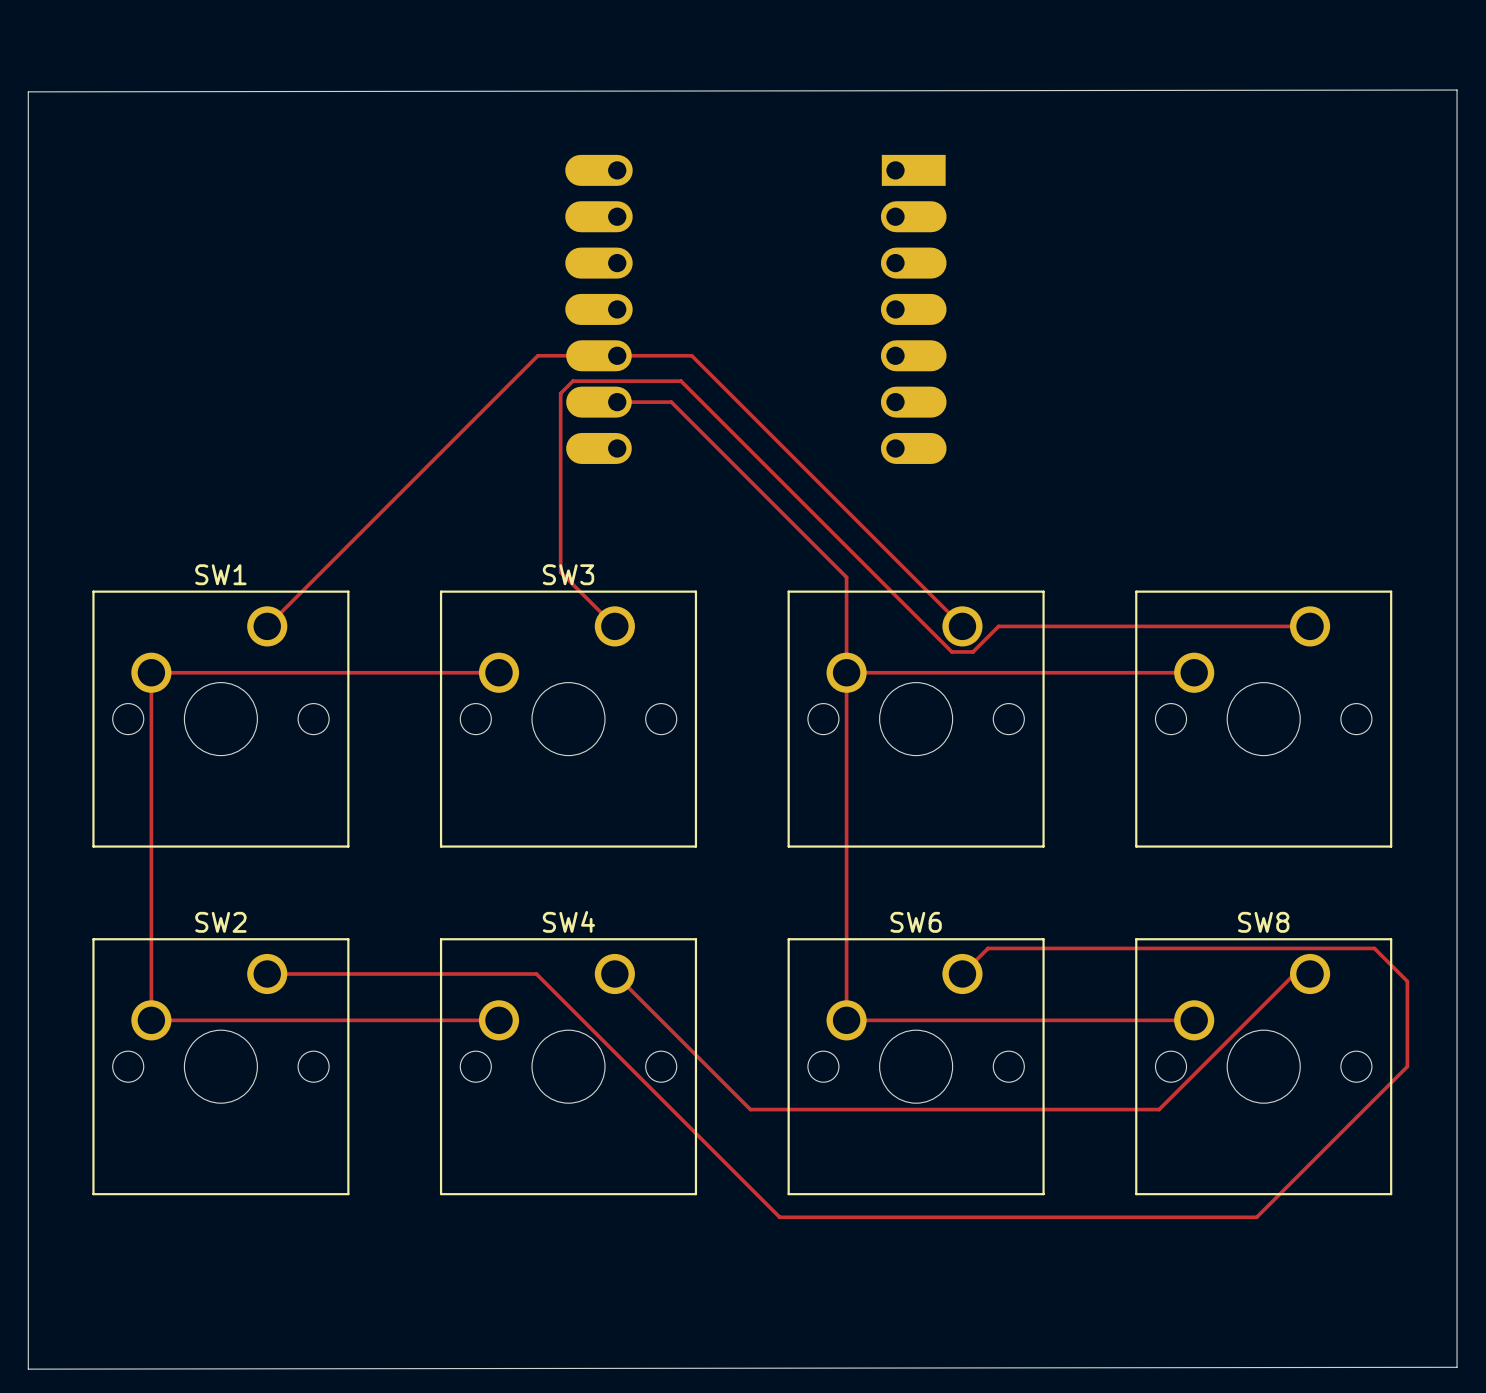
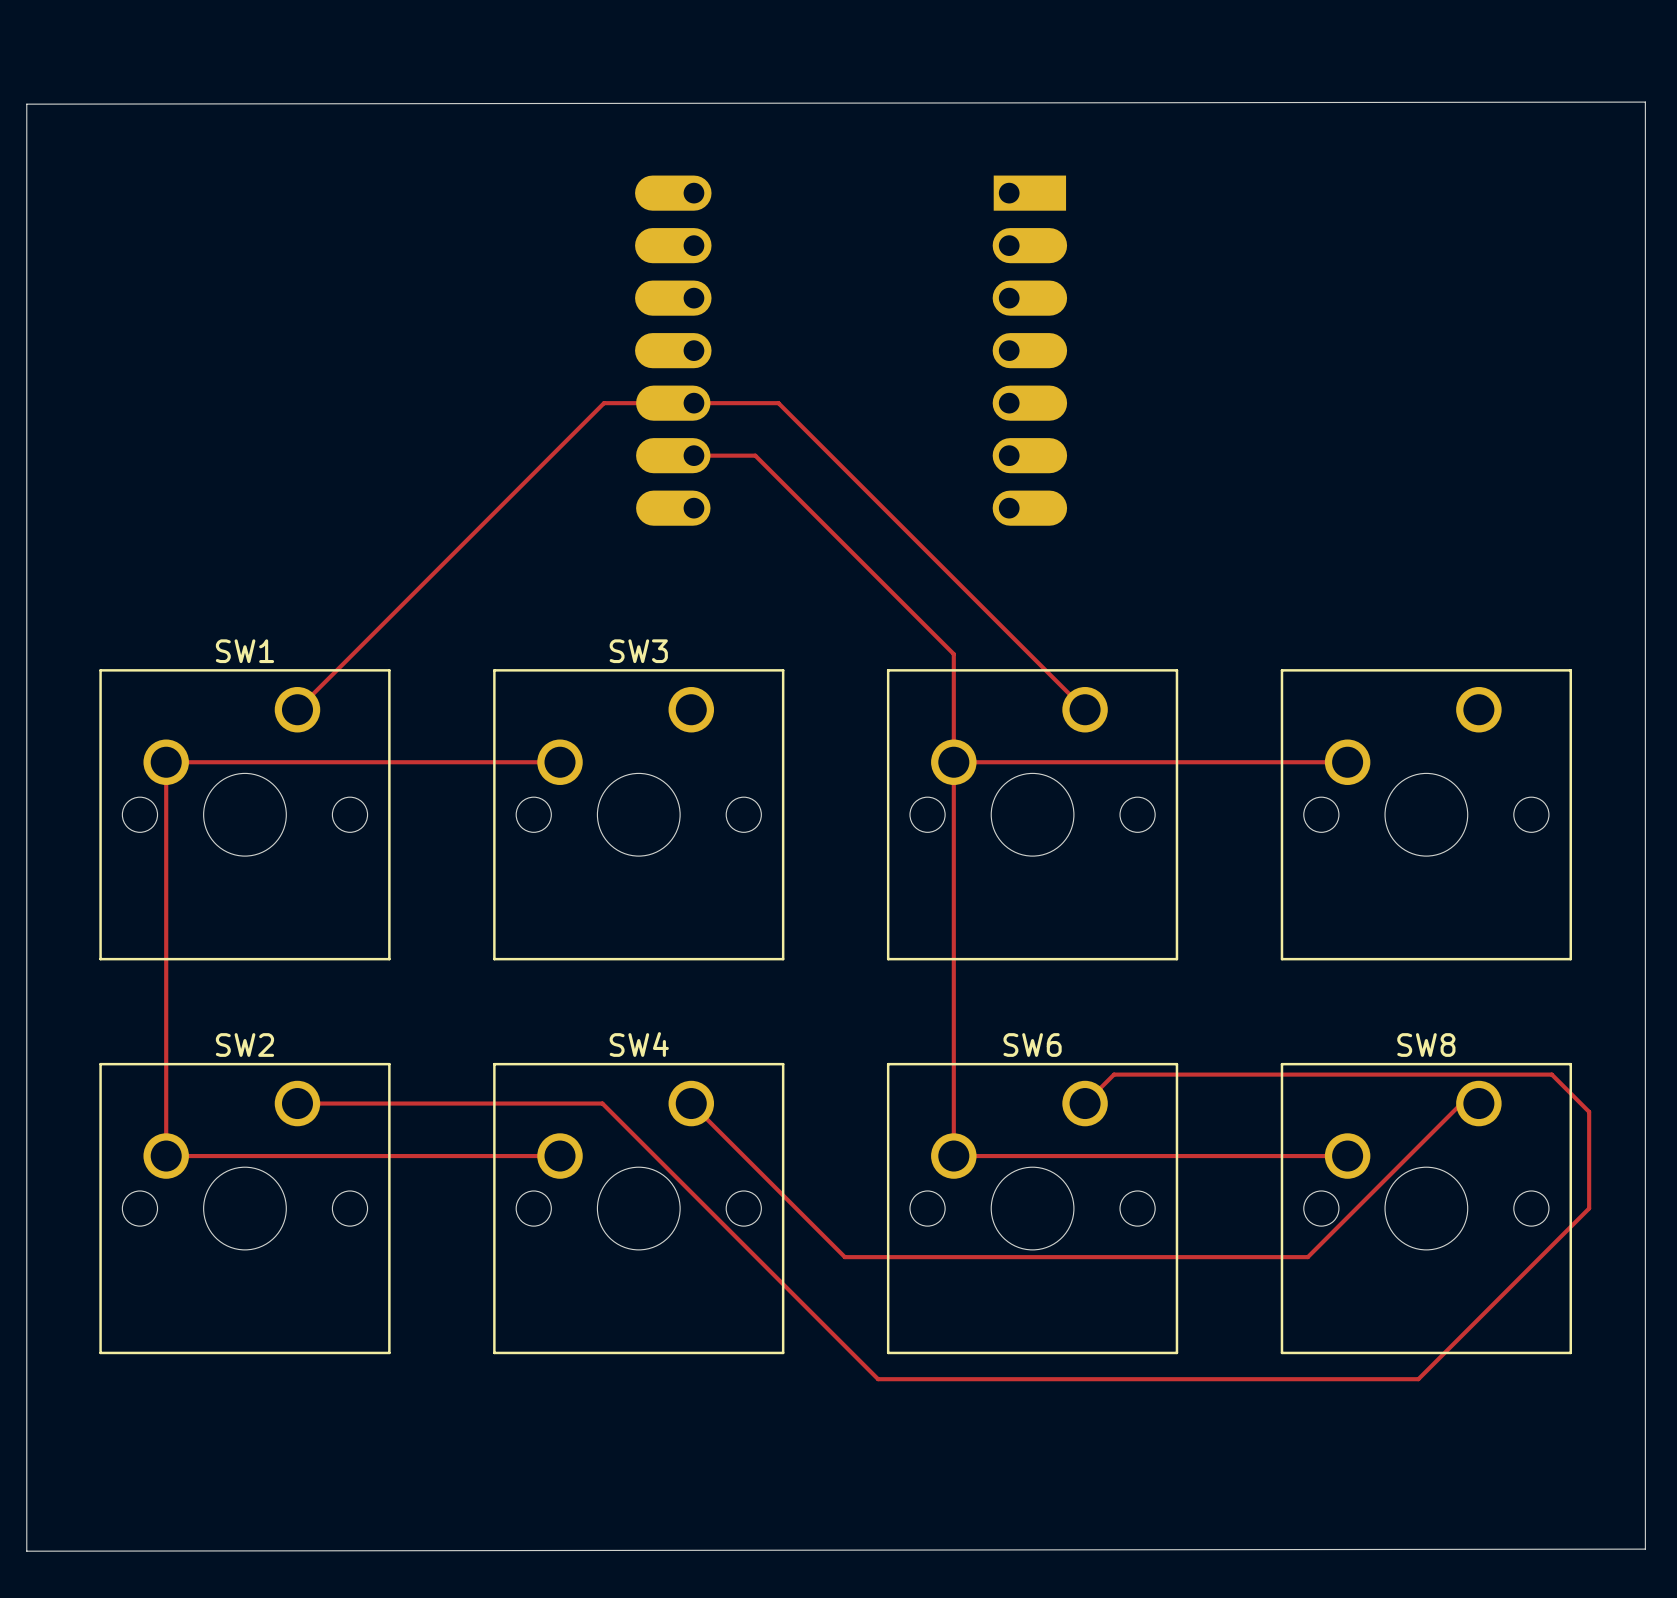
track: (614, 626) (560, 572) (560, 393) (572, 381) (681, 381) (951, 651) (973, 651) (998, 626) (1310, 626) -> none

